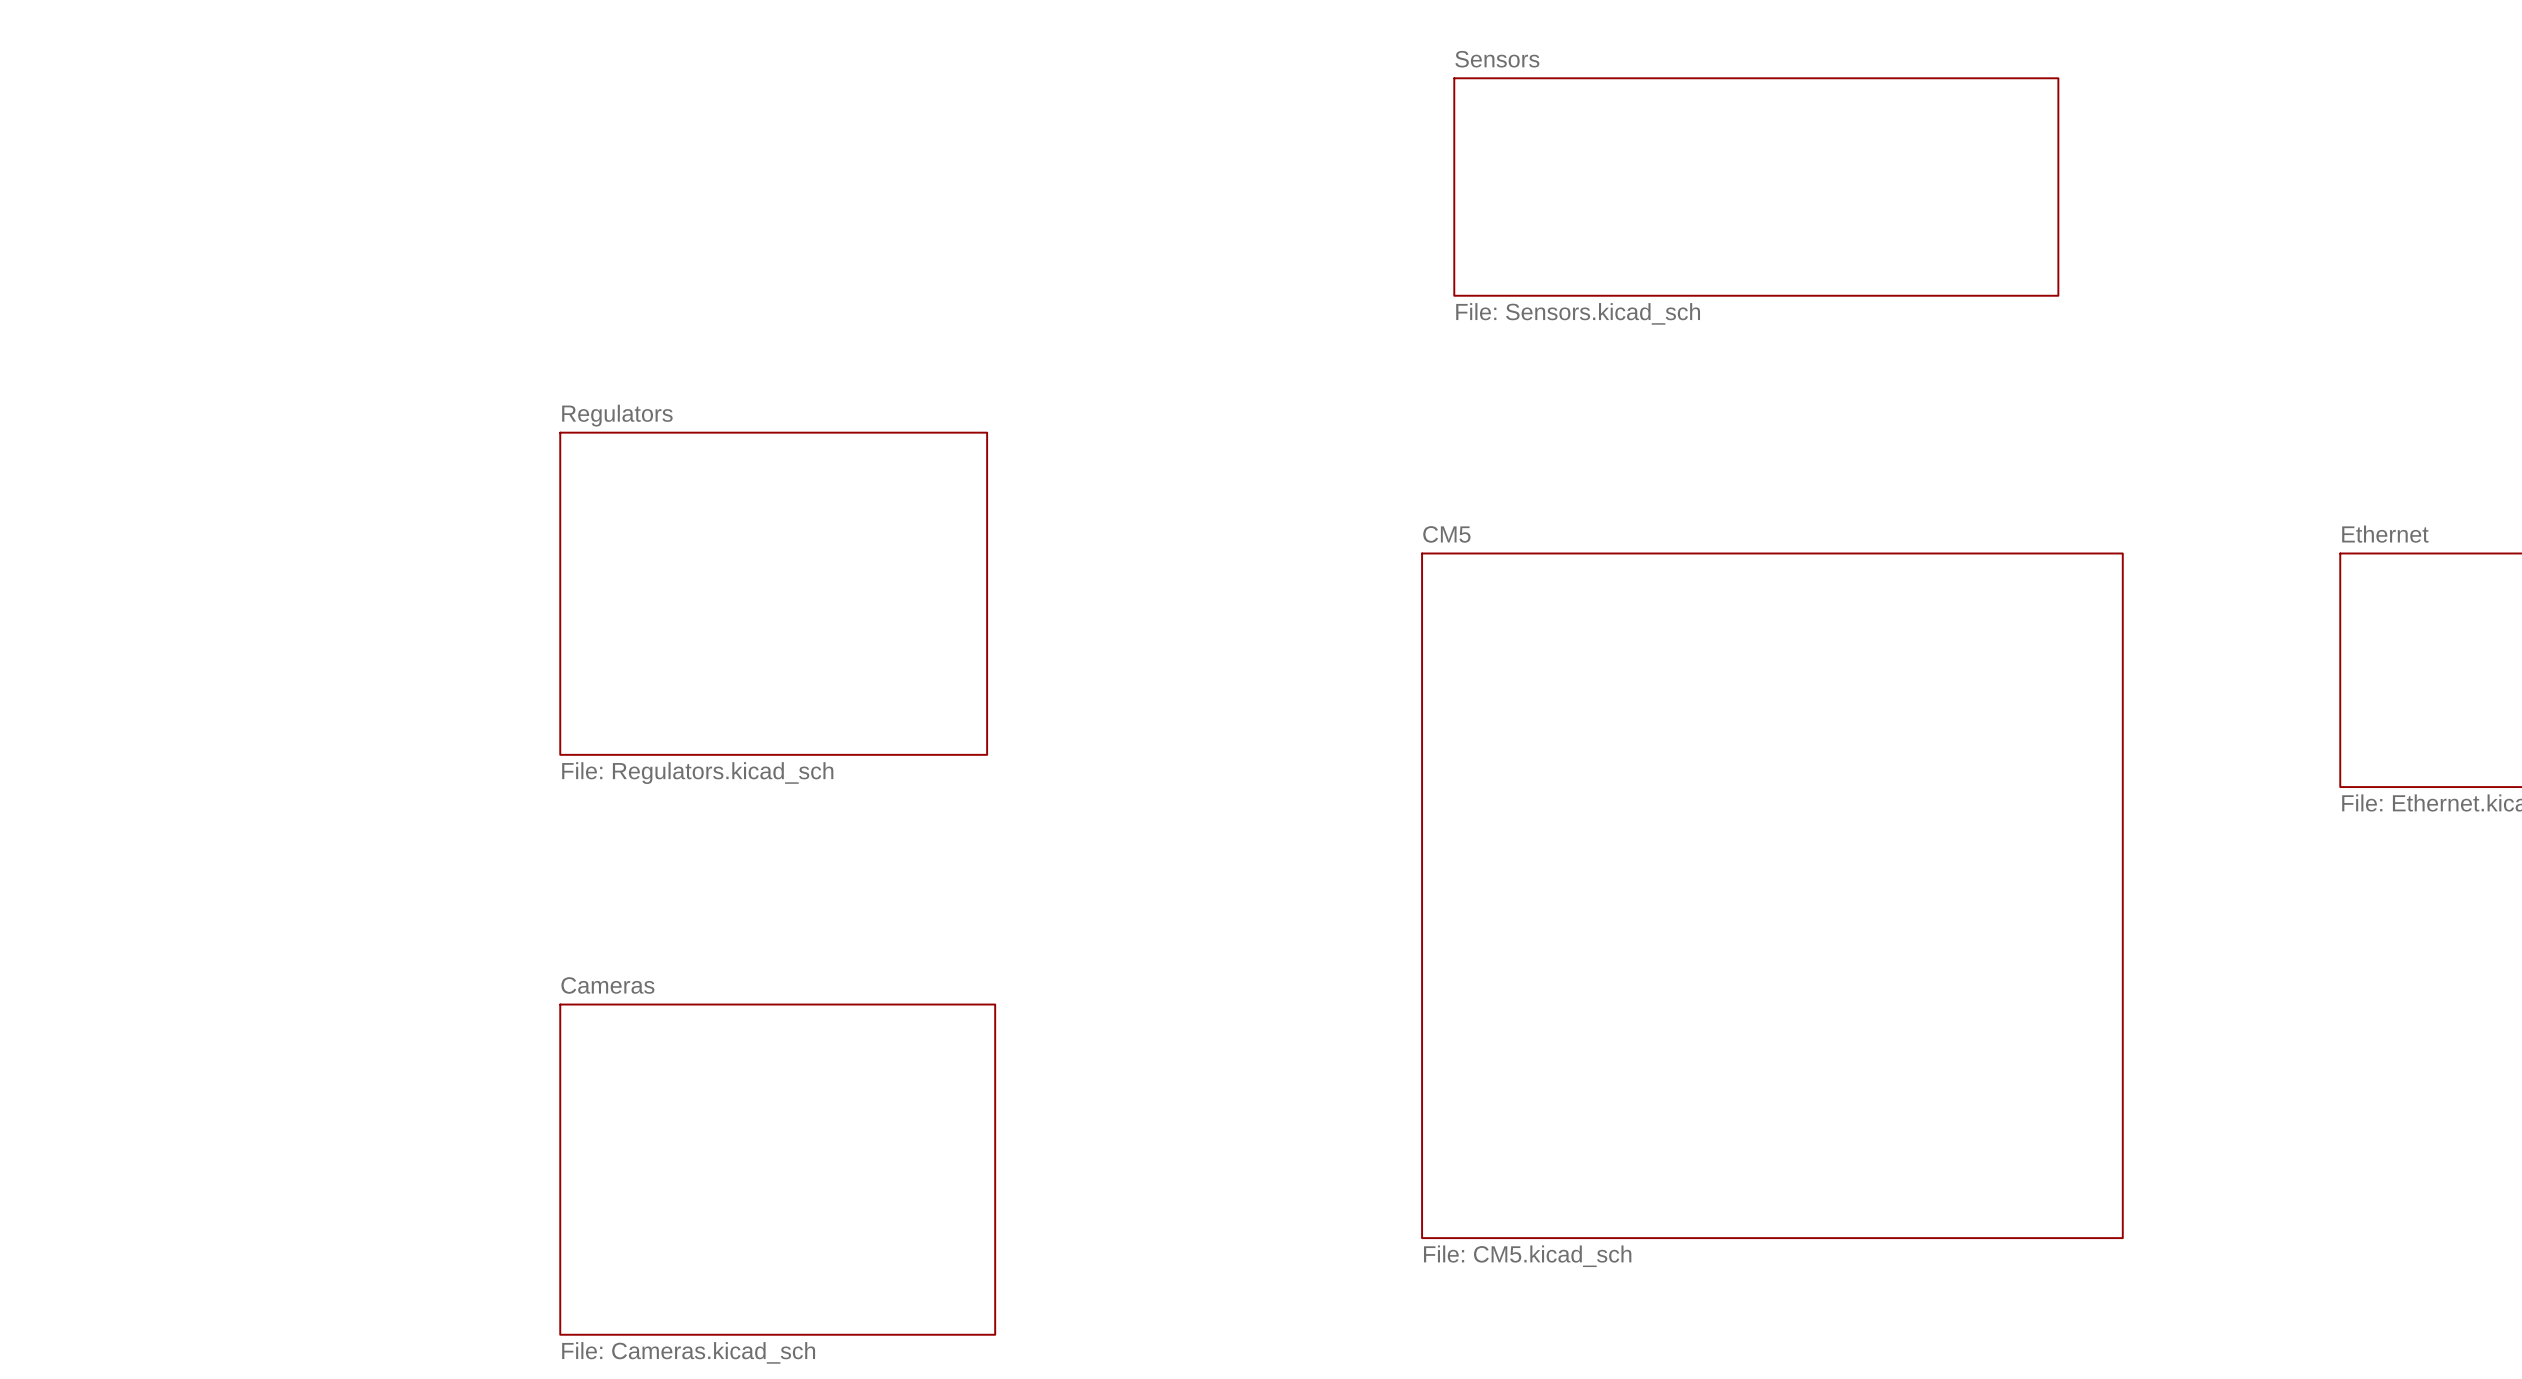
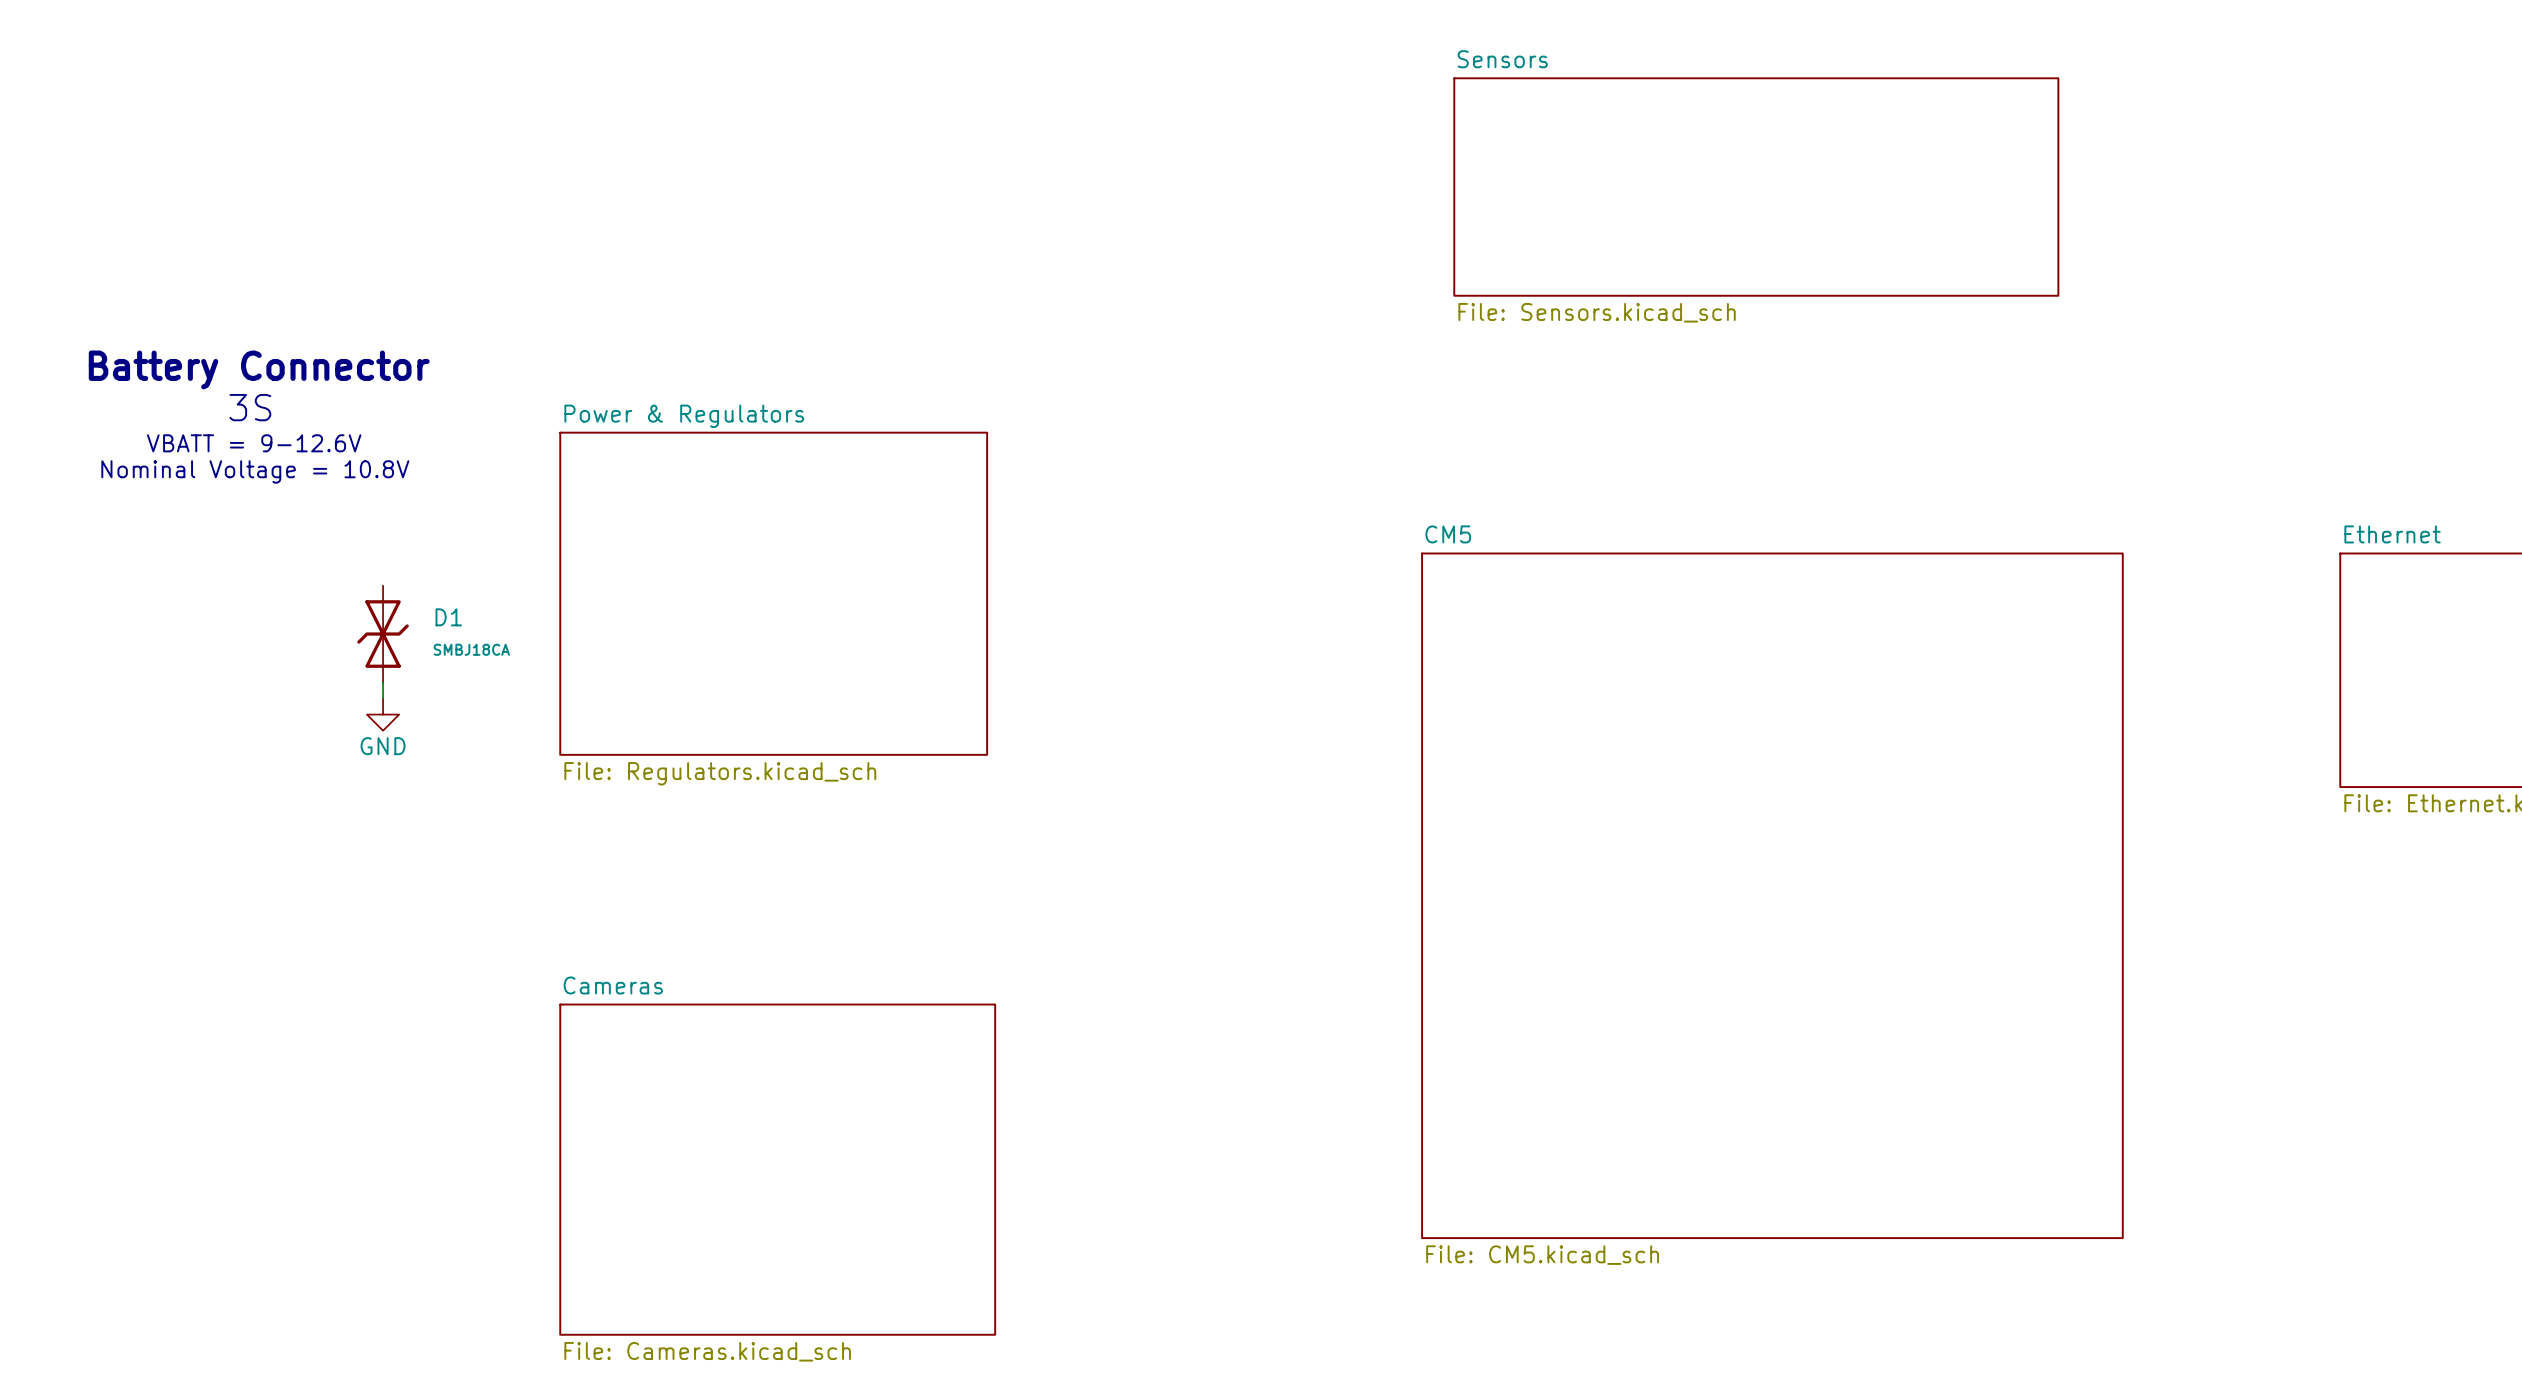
text: none -> Battery Connector (259, 369)
text: none -> 3S (250, 407)
sheet Regulators name: Regulators (617, 415) -> Power & Regulators (684, 416)
text: none -> VBATT = 9-12.6V (254, 443)
text: none -> Nominal Voltage = 10.8V (255, 471)
D1: none -> SMBJ18CA (383, 634)
wire: none -> (383, 682) (383, 698)
power symbol: none -> GND (383, 714)

